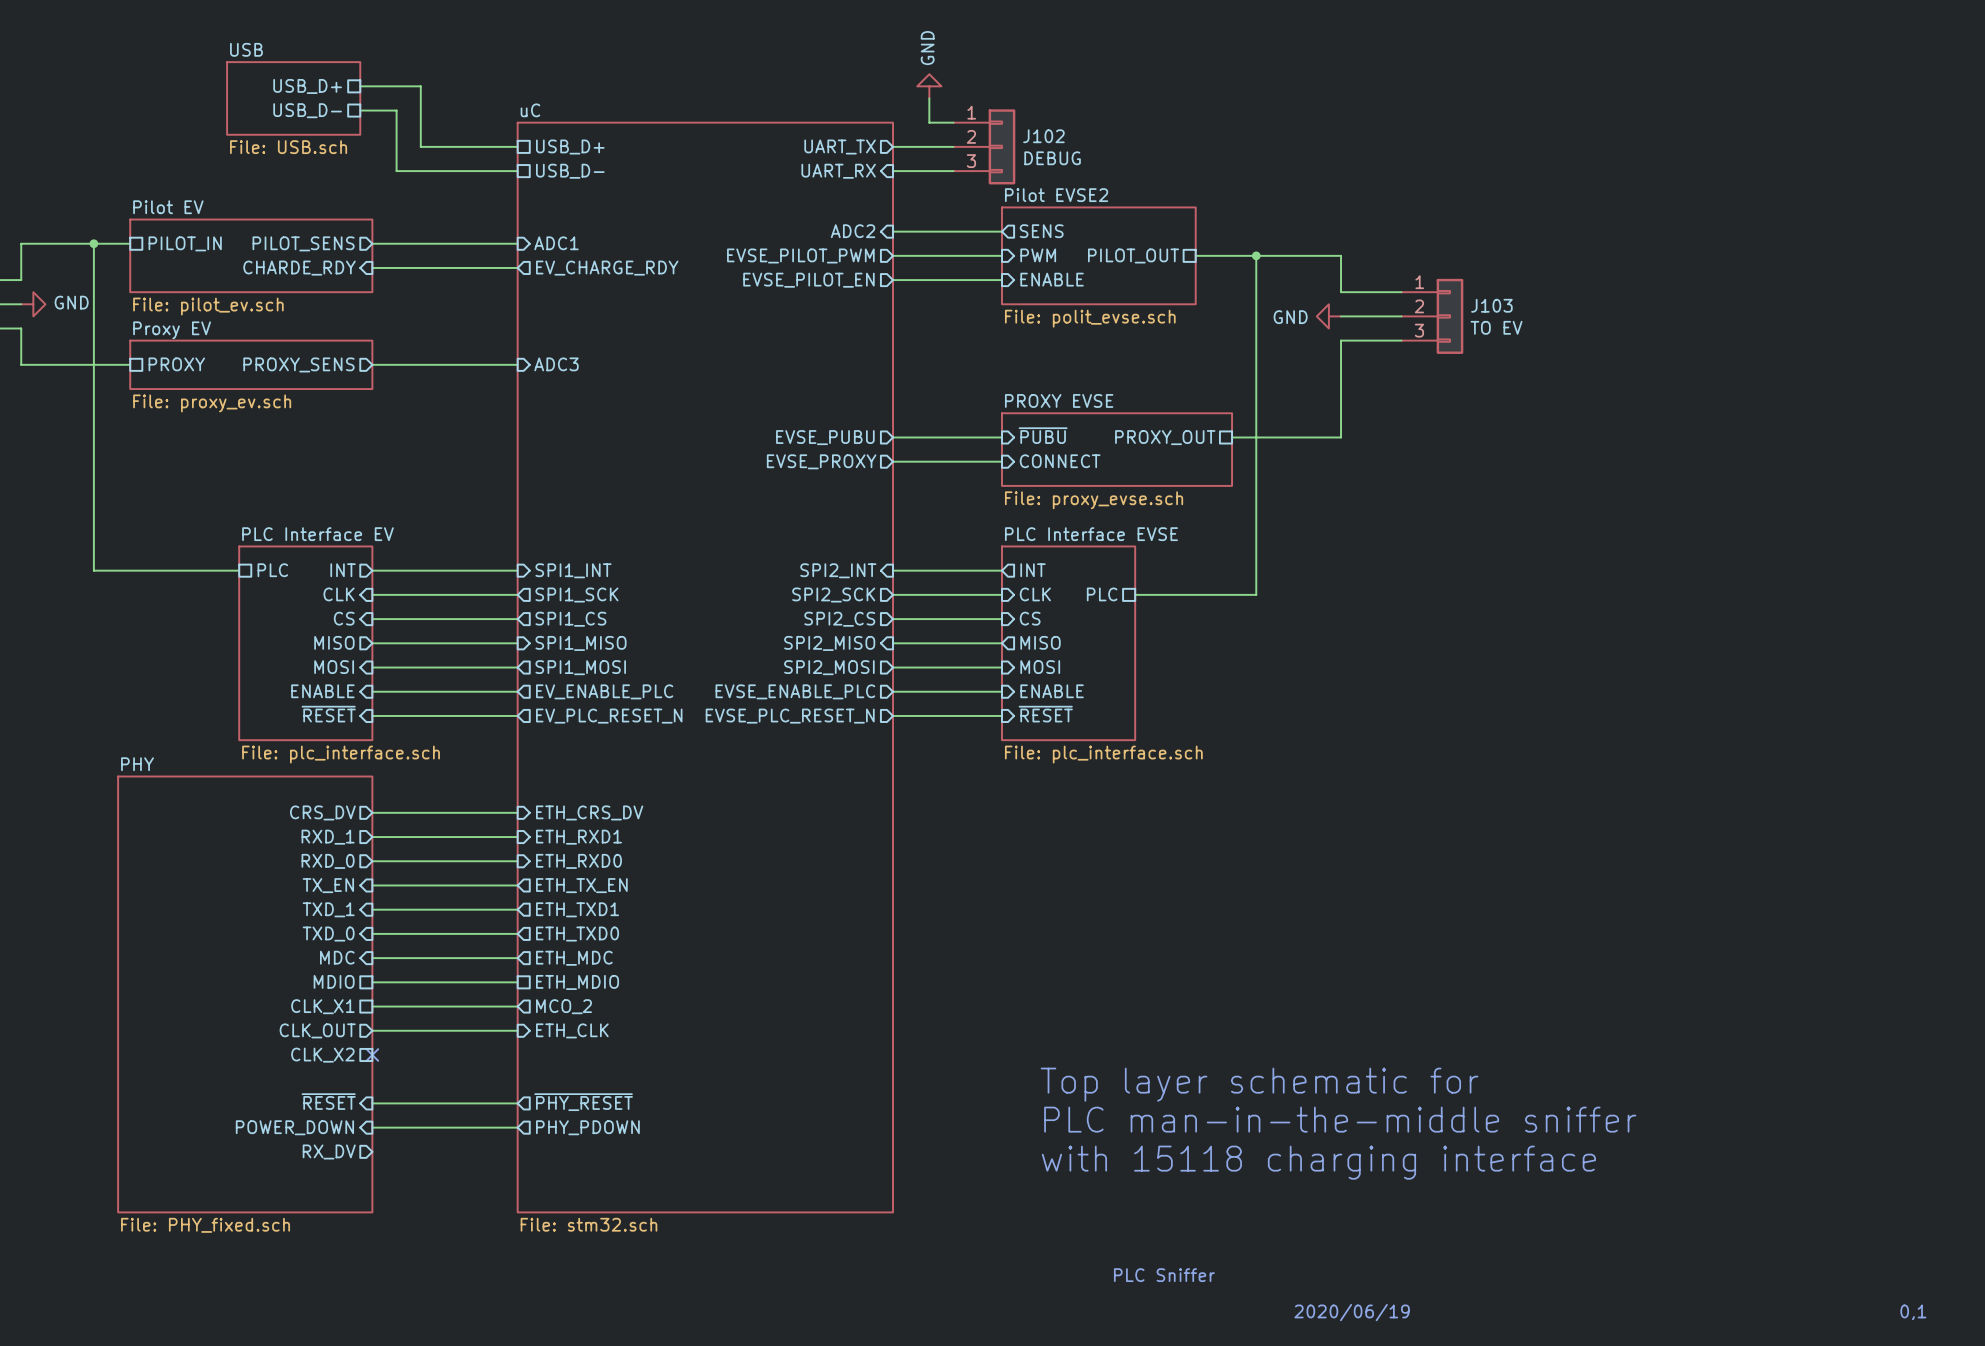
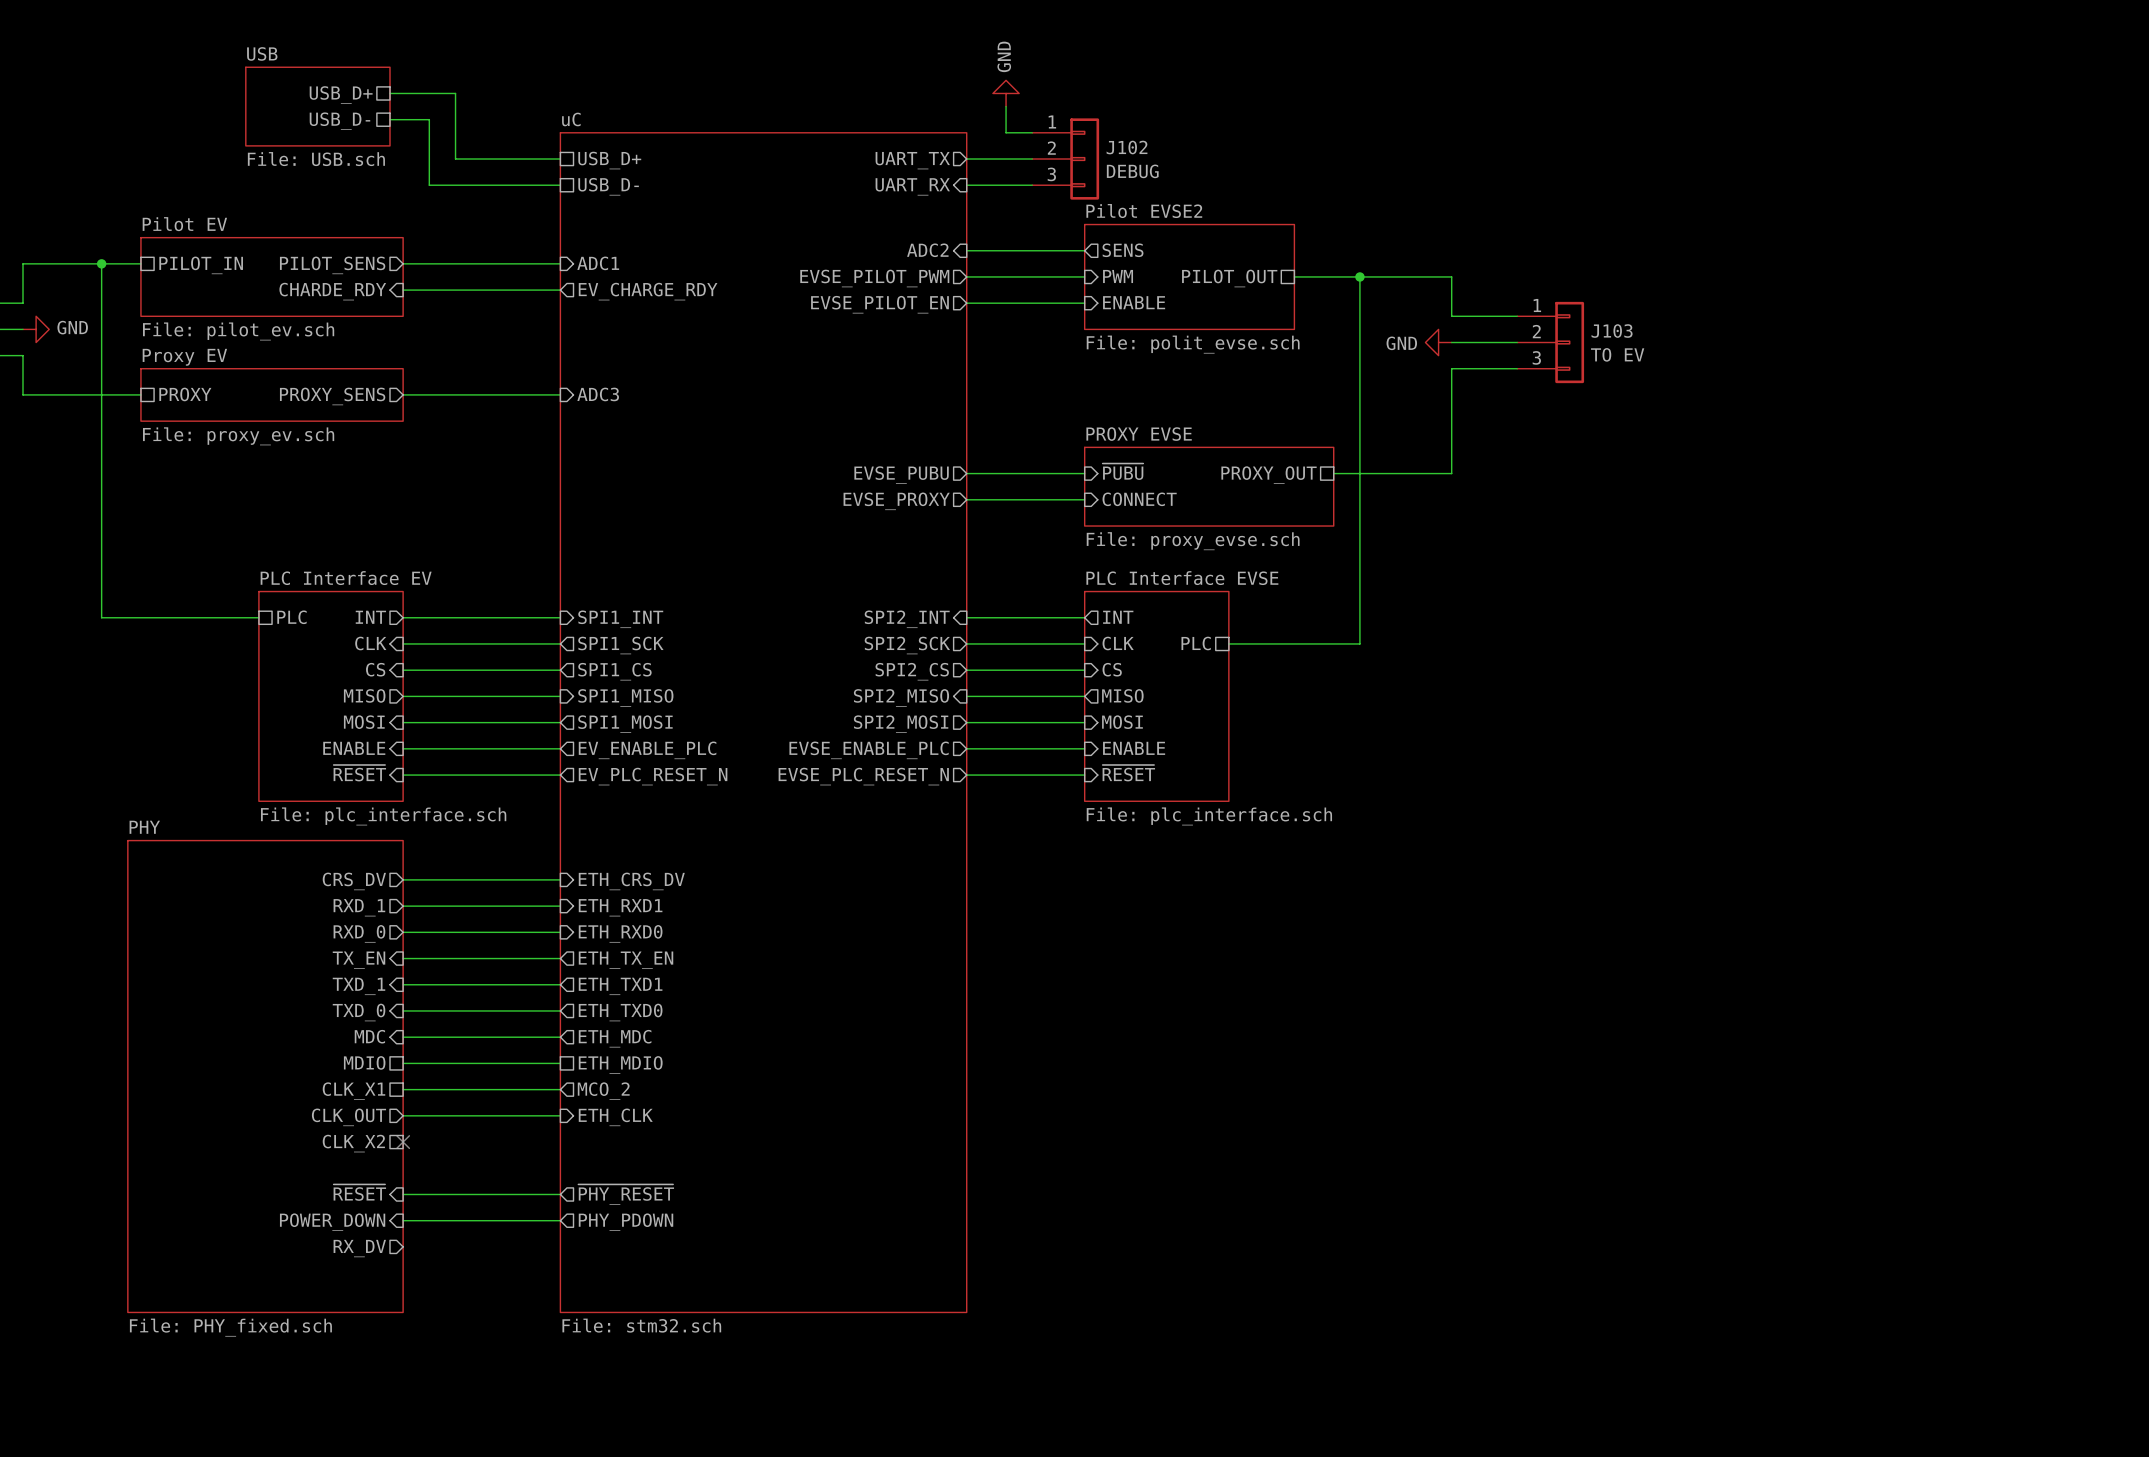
text: Top layer schematic for (1259, 1084) -> none
text: PLC man-in-the-middle sniffer (1340, 1119) -> none
text: with 15118 charging interface (1318, 1162) -> none
text: PLC Sniffer (1164, 1275) -> none
text: 2020/06/19 (1352, 1312) -> none
text: 0,1 (1913, 1312) -> none

